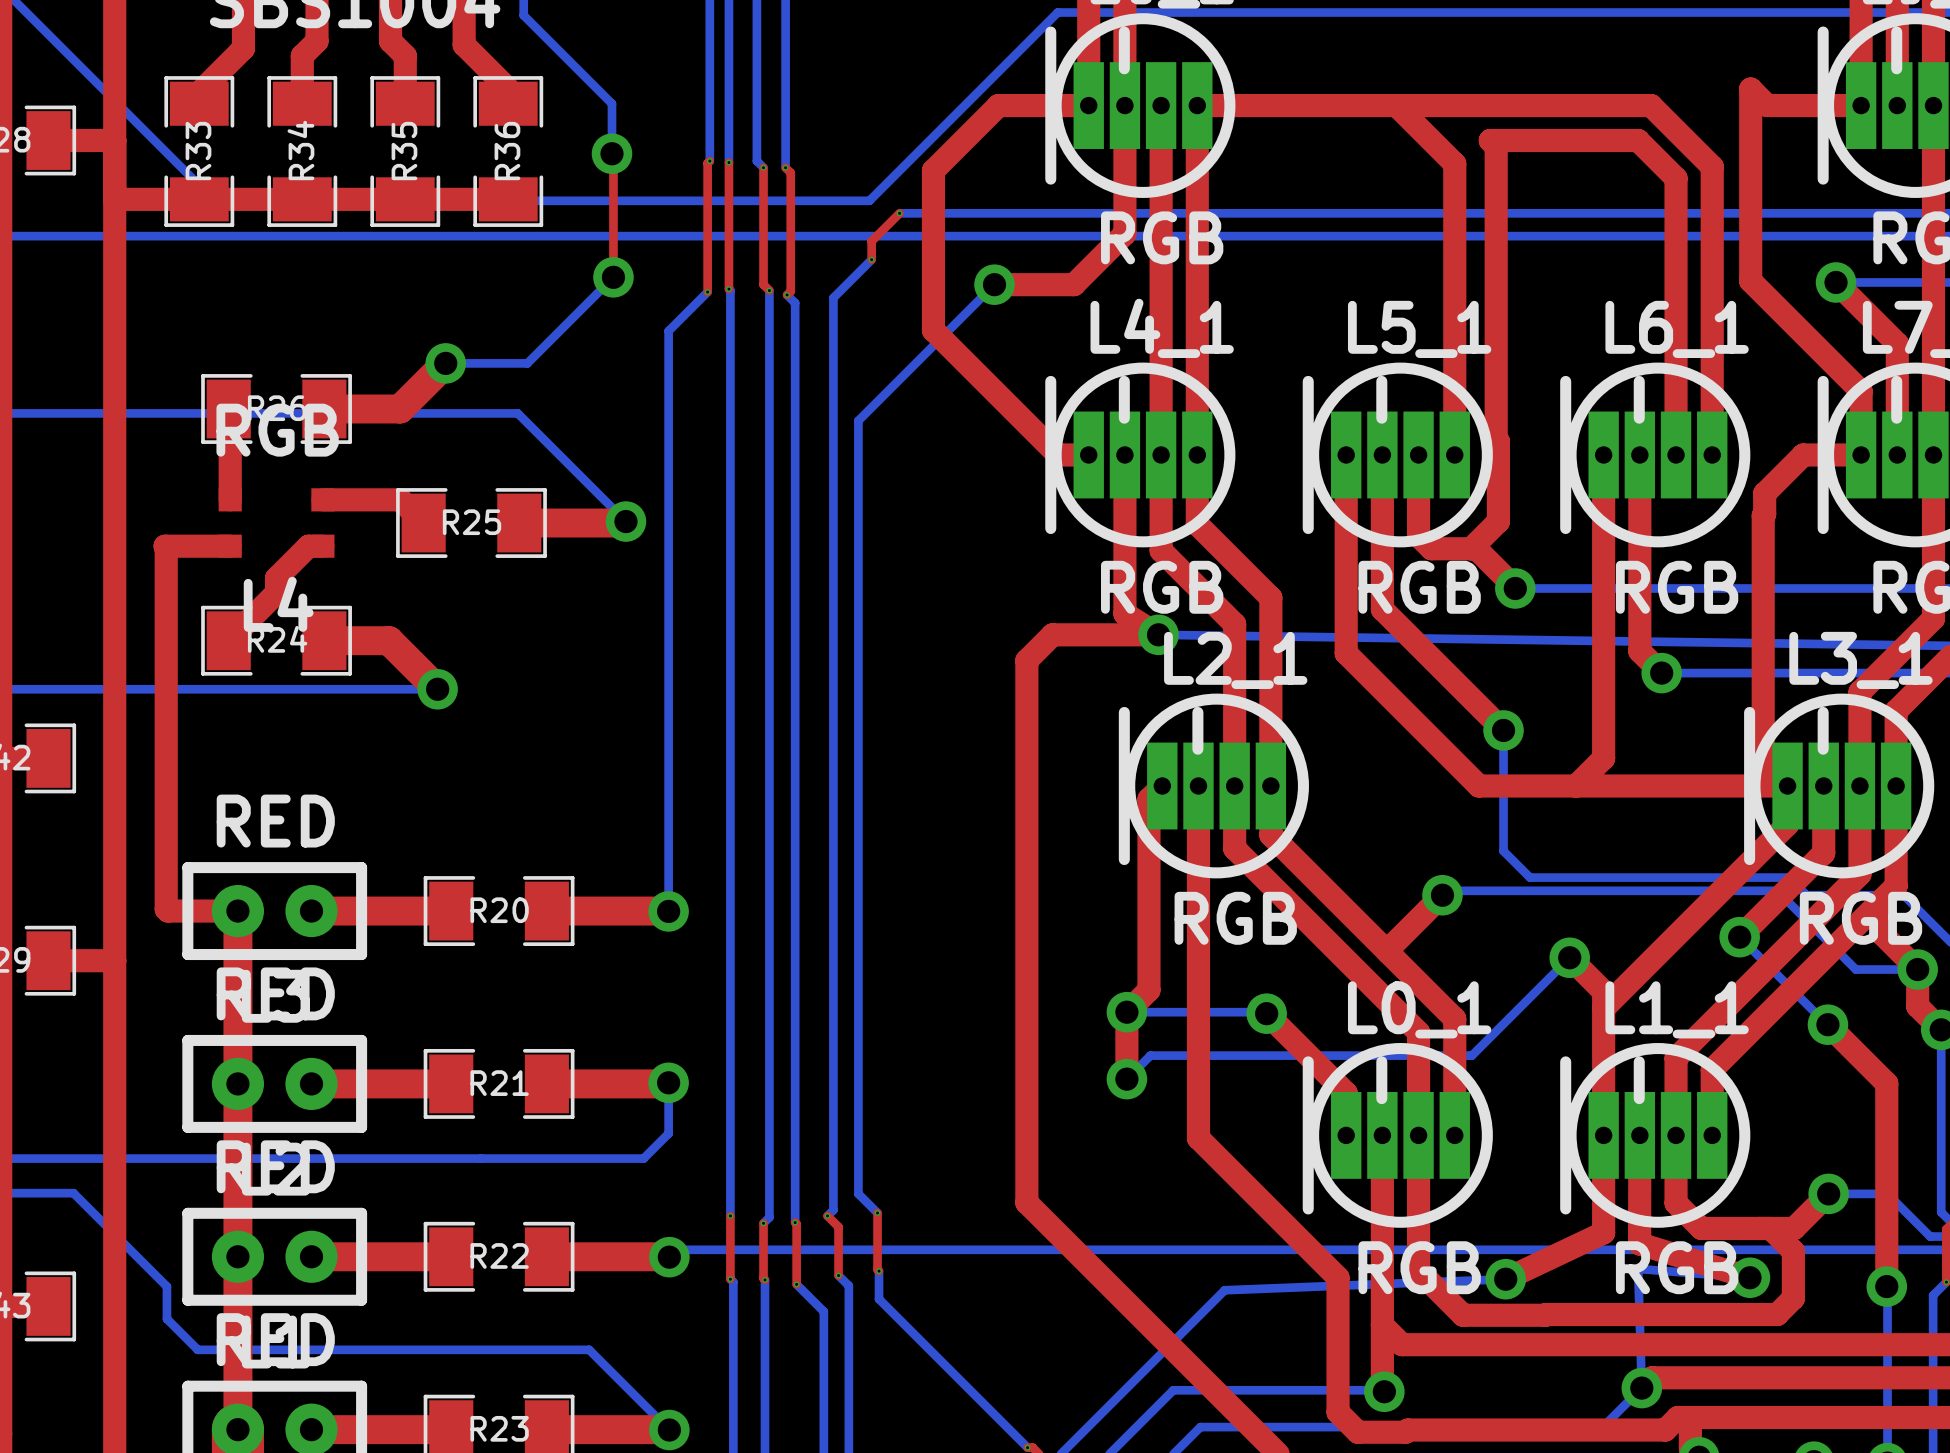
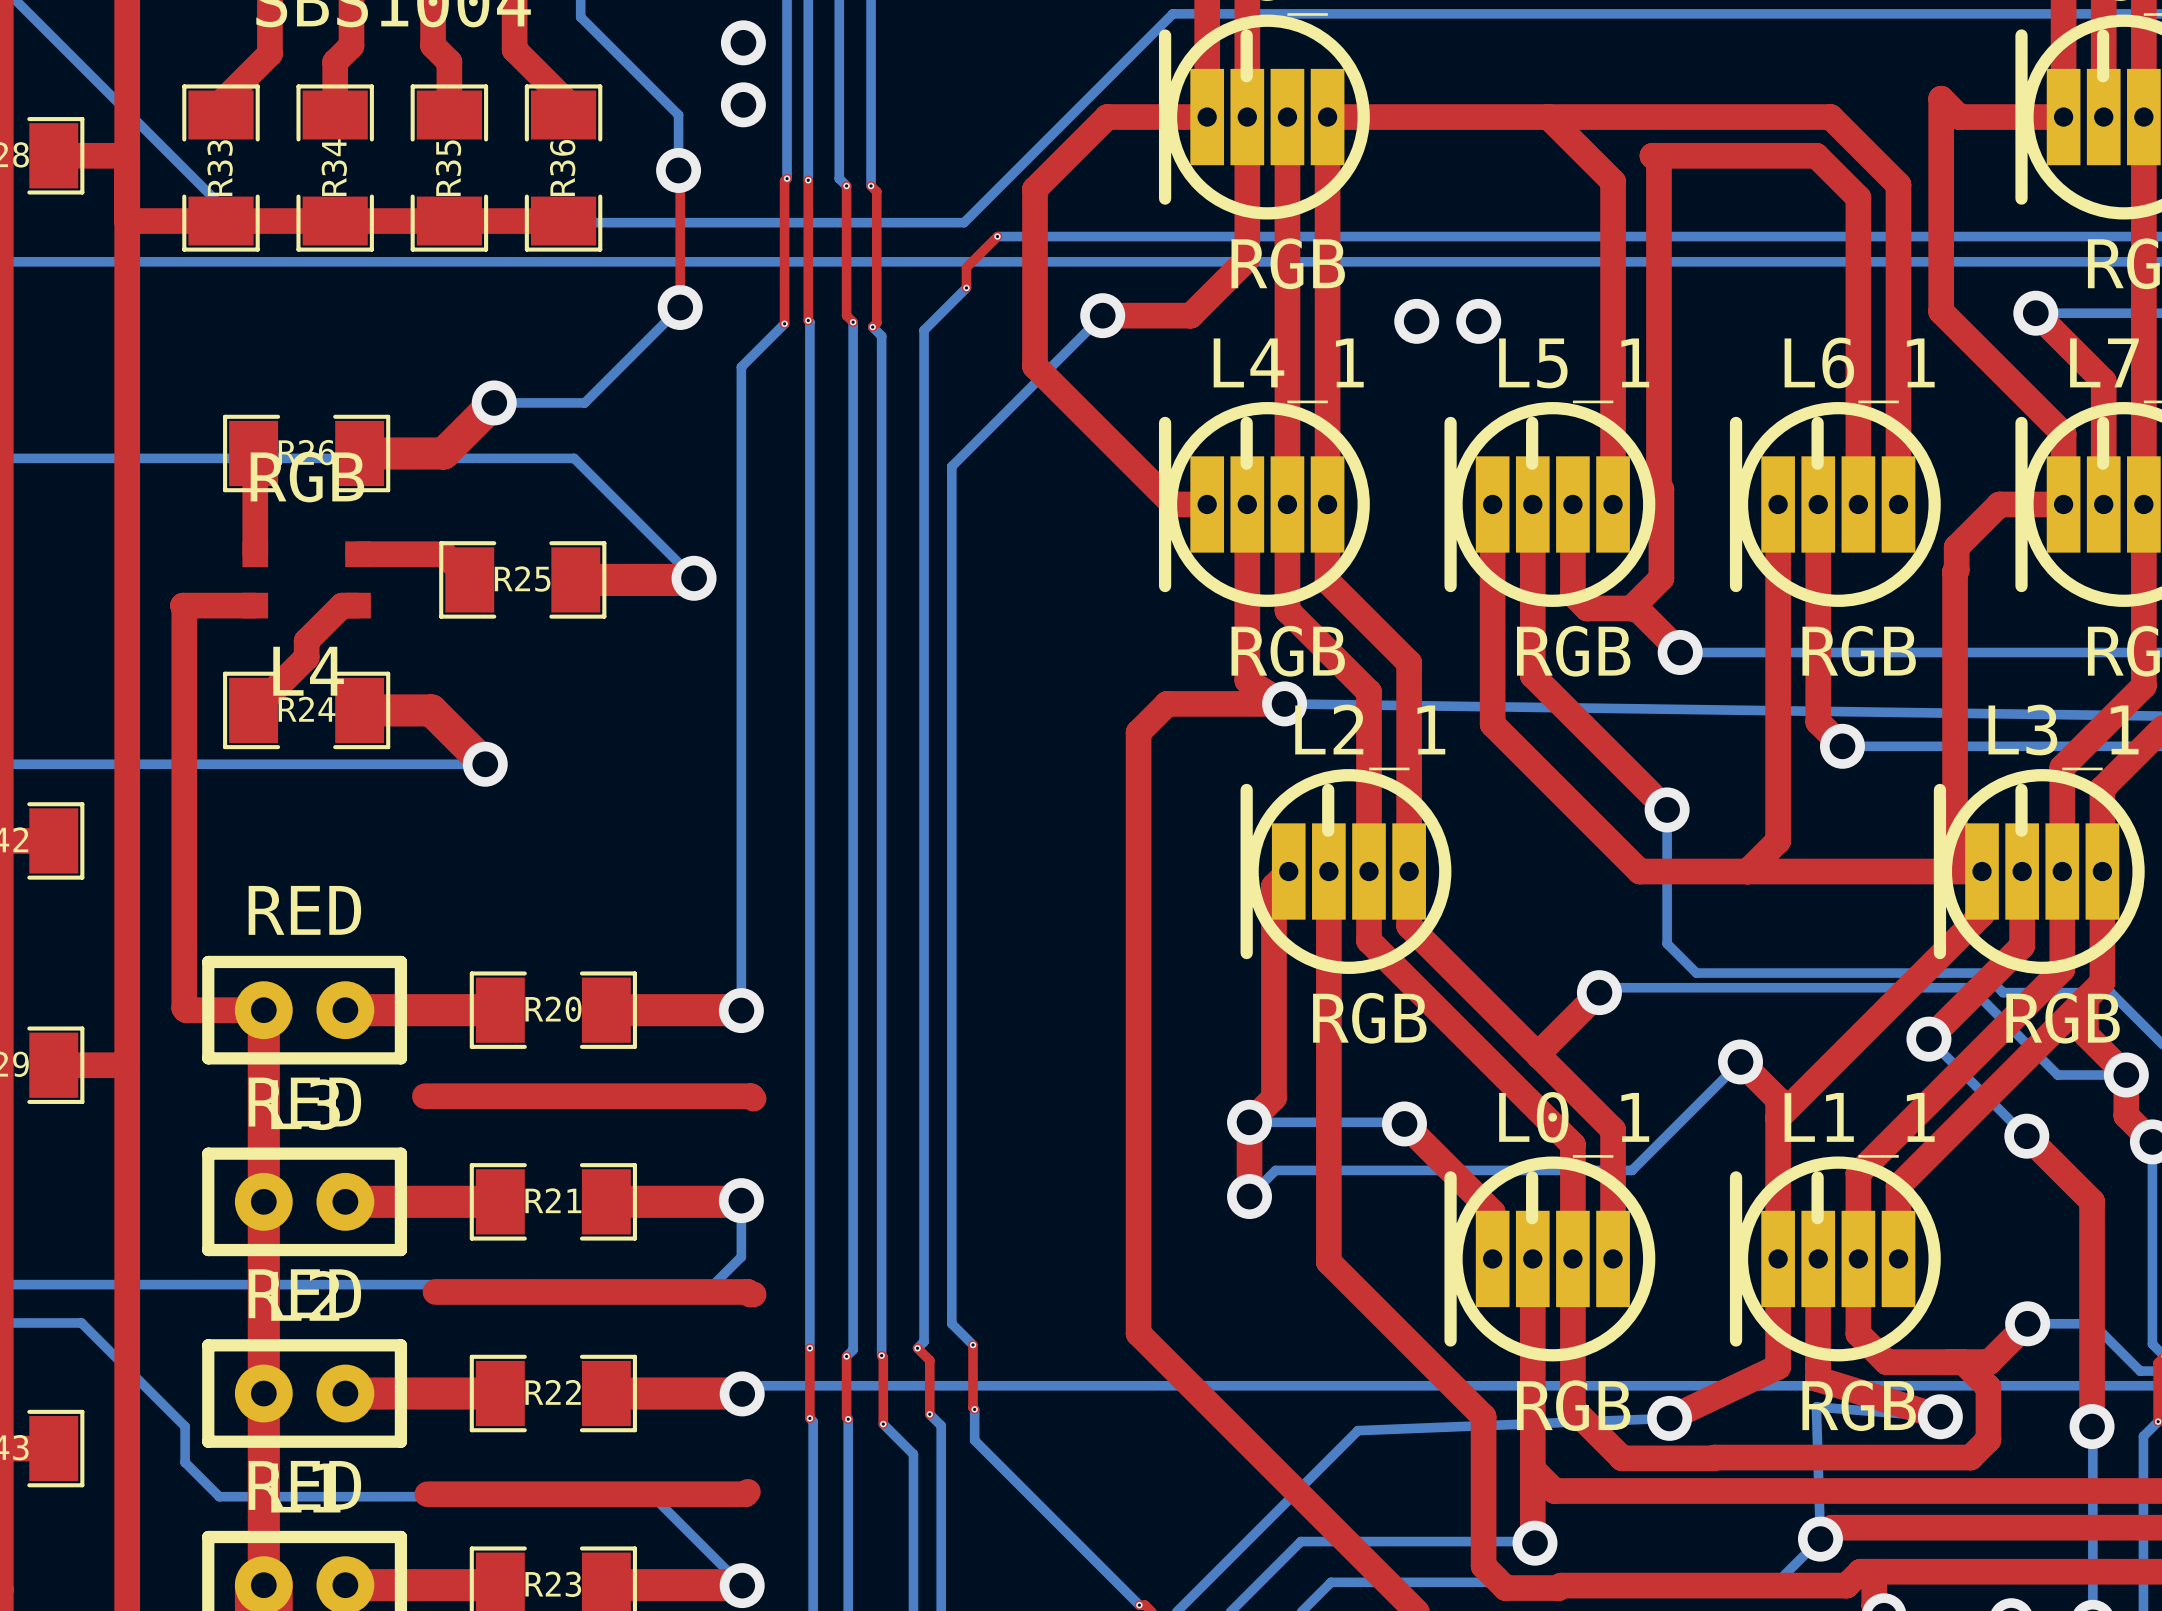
via: none -> (743, 42)
via: none -> (743, 104)
via: none -> (1416, 321)
via: none -> (1478, 321)
top track: none -> (424, 1096) (751, 1096) (753, 1098)
top track: none -> (435, 1291) (747, 1291) (753, 1294)
top track: none -> (747, 1491) (745, 1494) (427, 1494)

